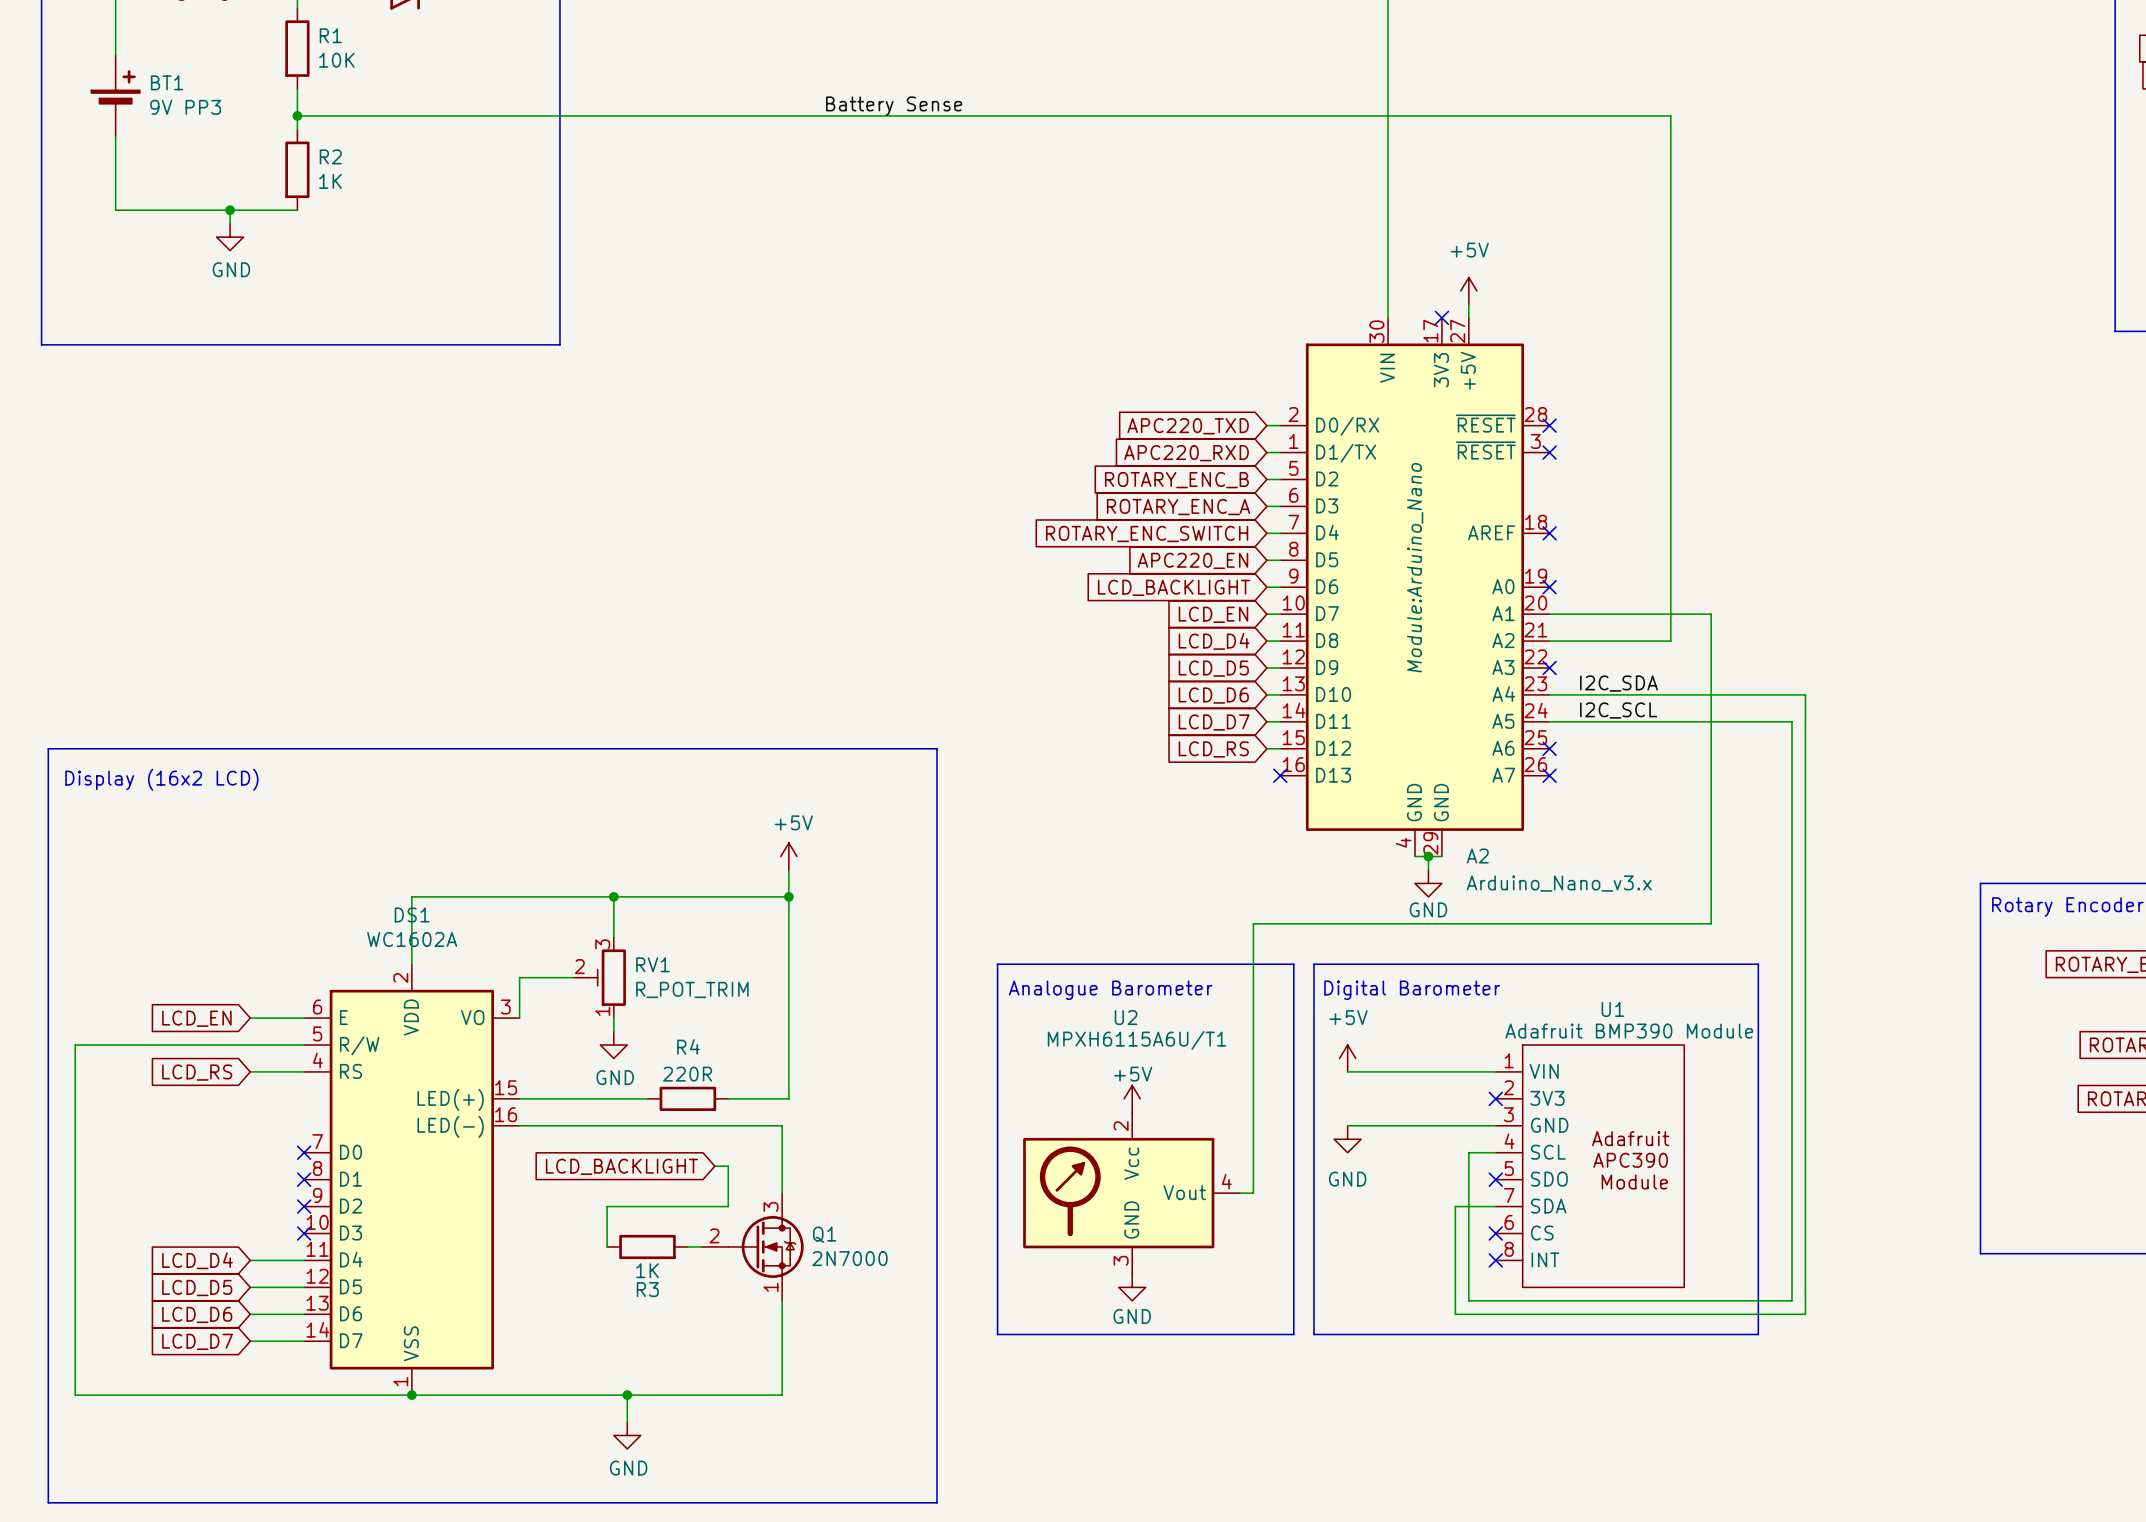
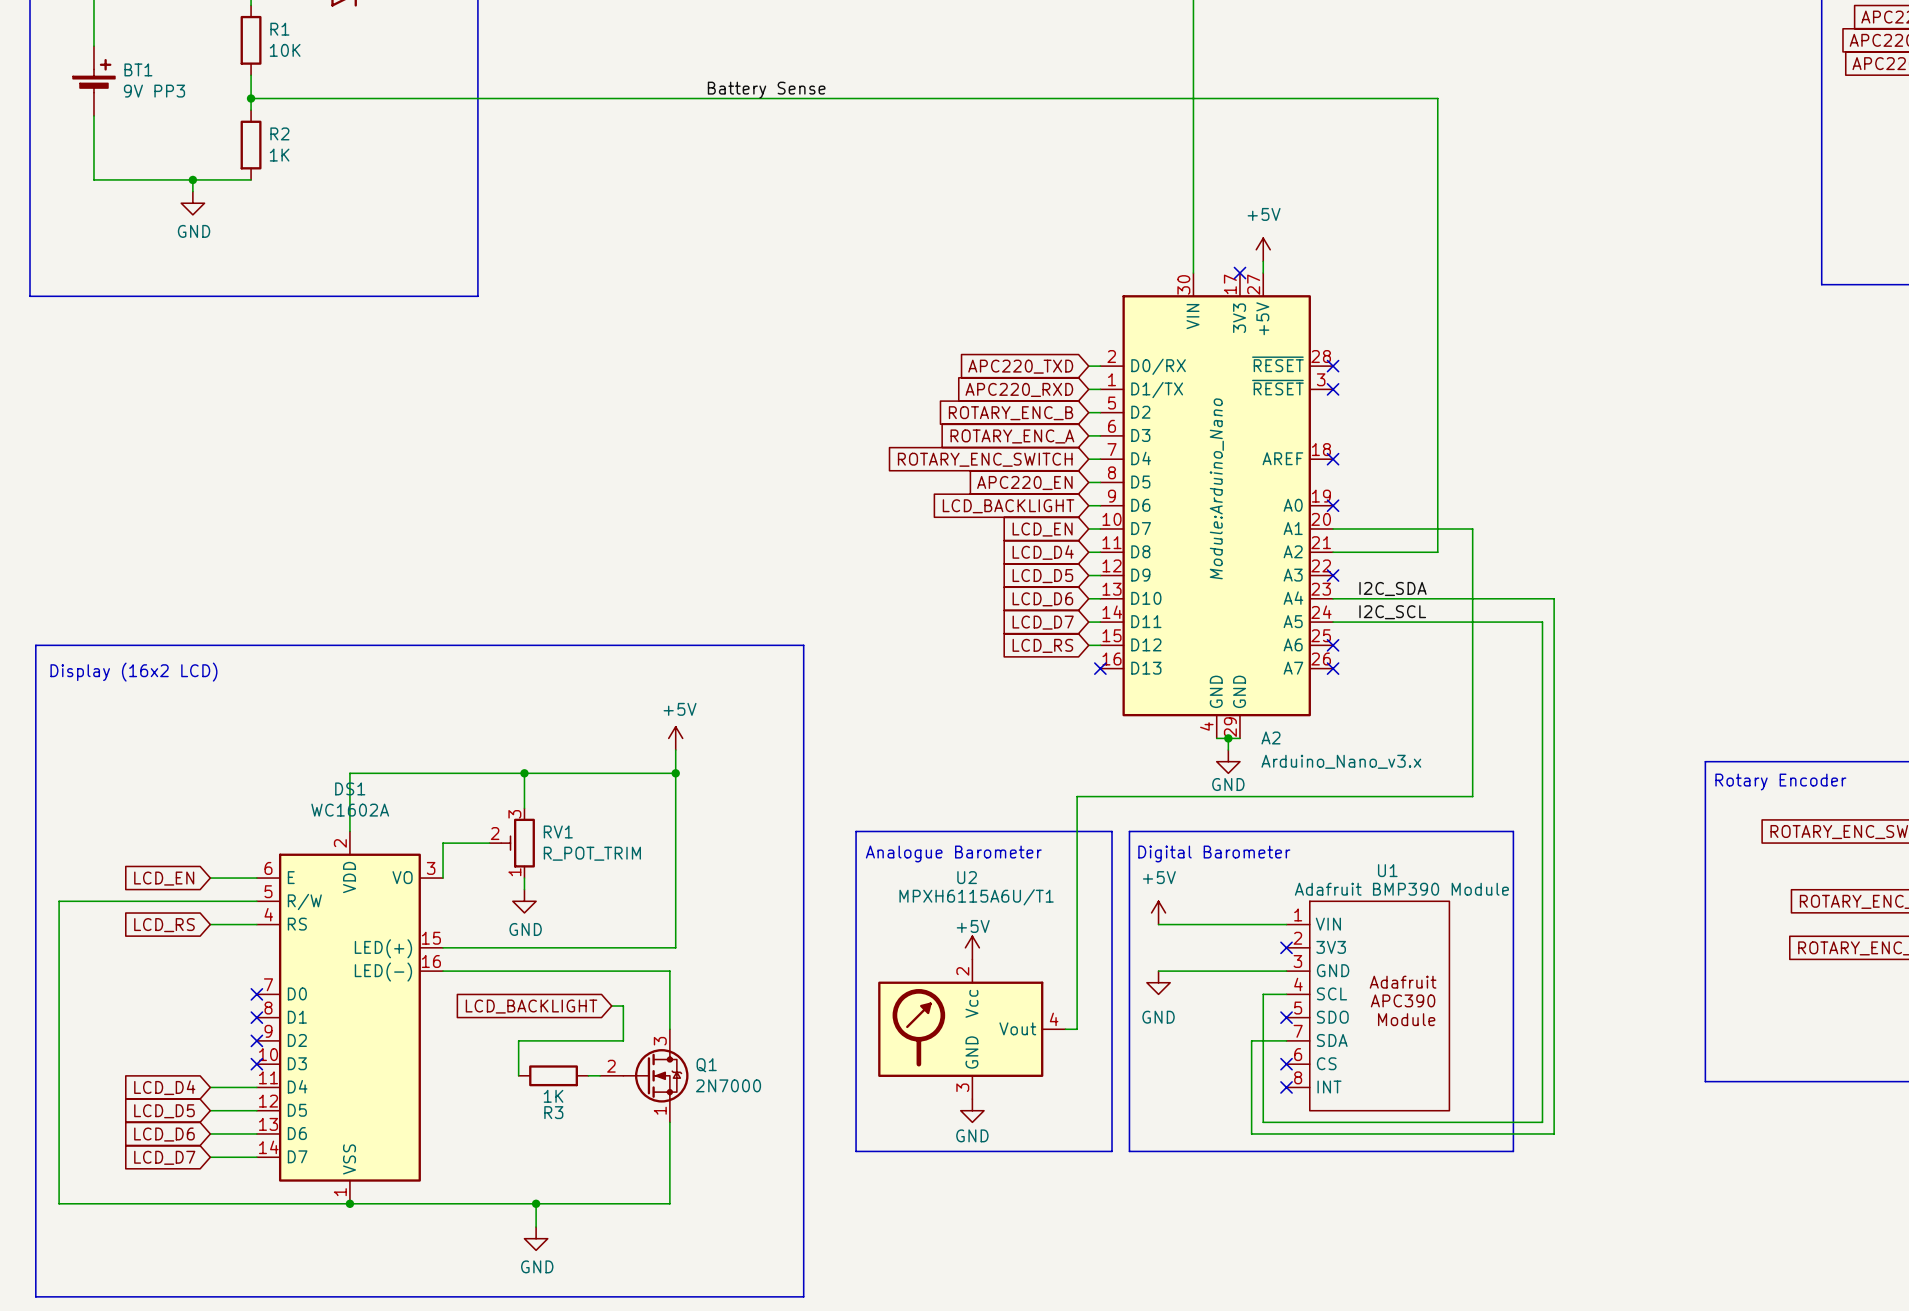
wire: none -> (553, 947) (623, 947)
R4: 220R (687, 1098) -> none

